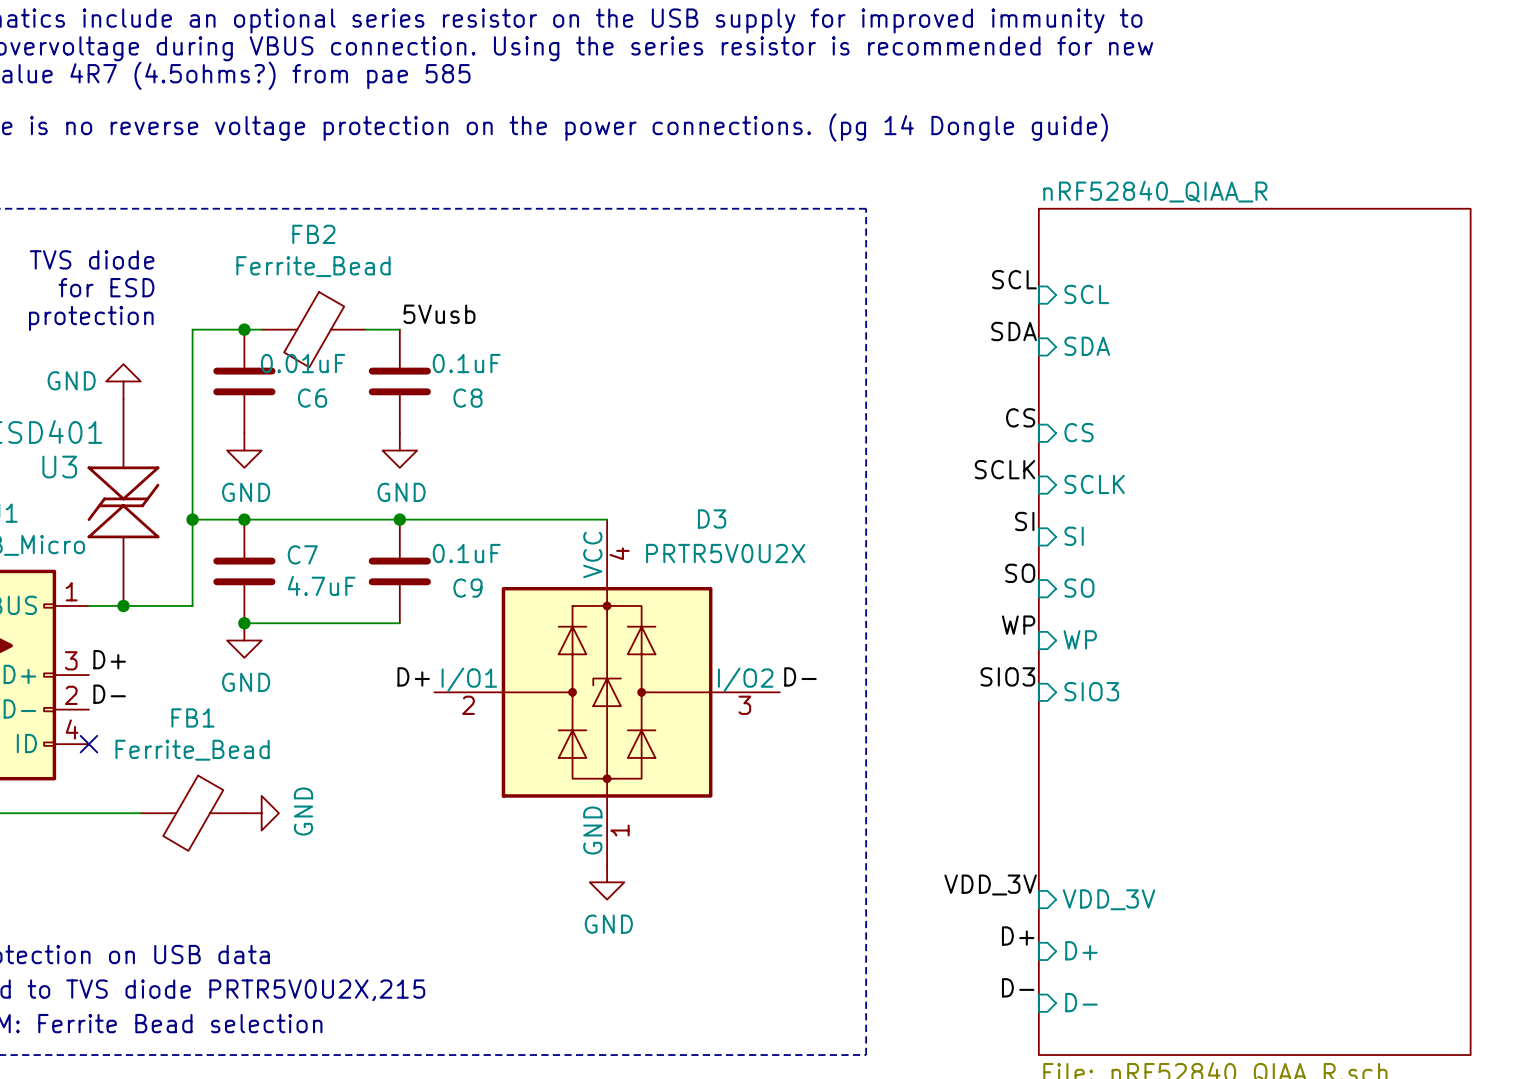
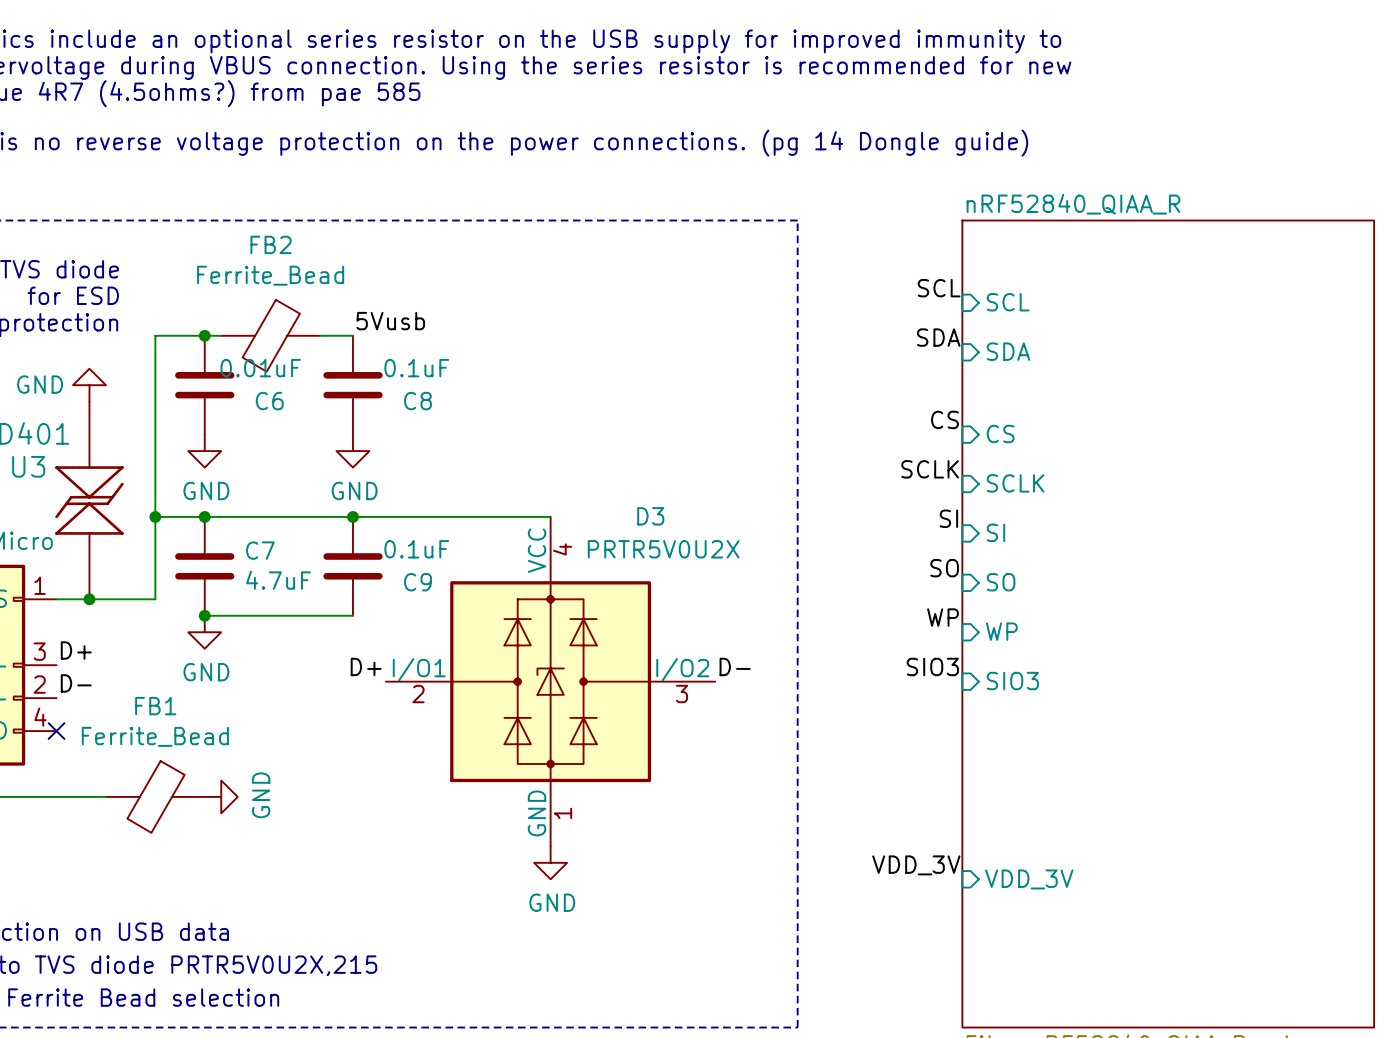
label: D+ (1018, 935) -> none
sheet pin: D+ (1081, 950) -> none
label: D- (1018, 987) -> none
sheet pin: D- (1081, 1002) -> none

